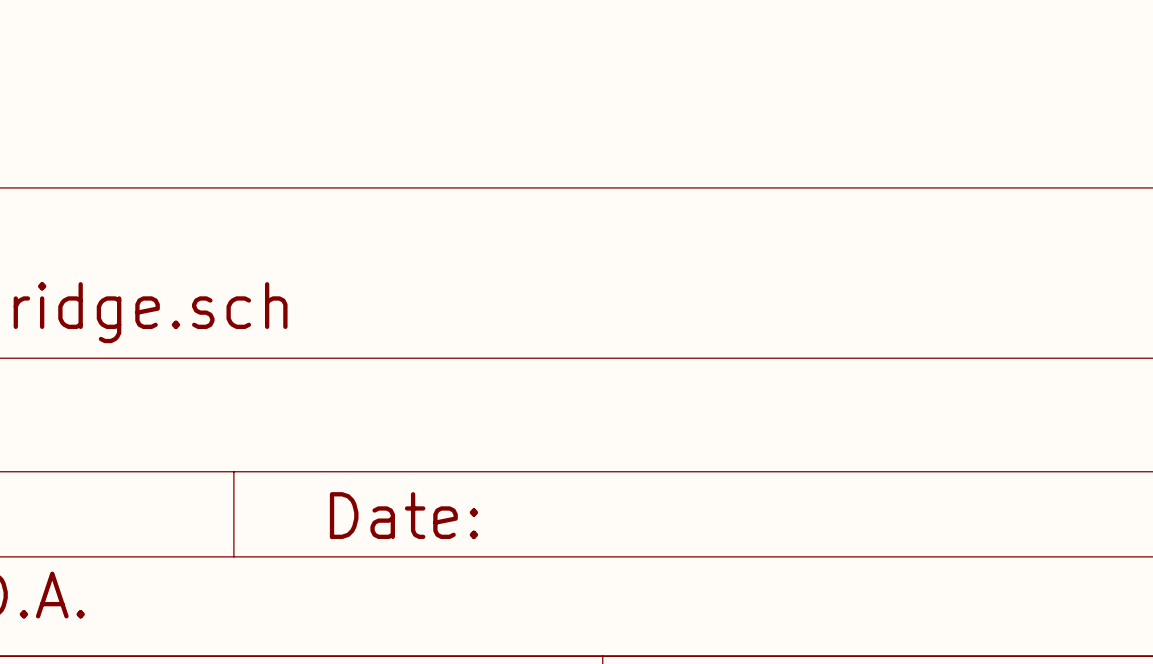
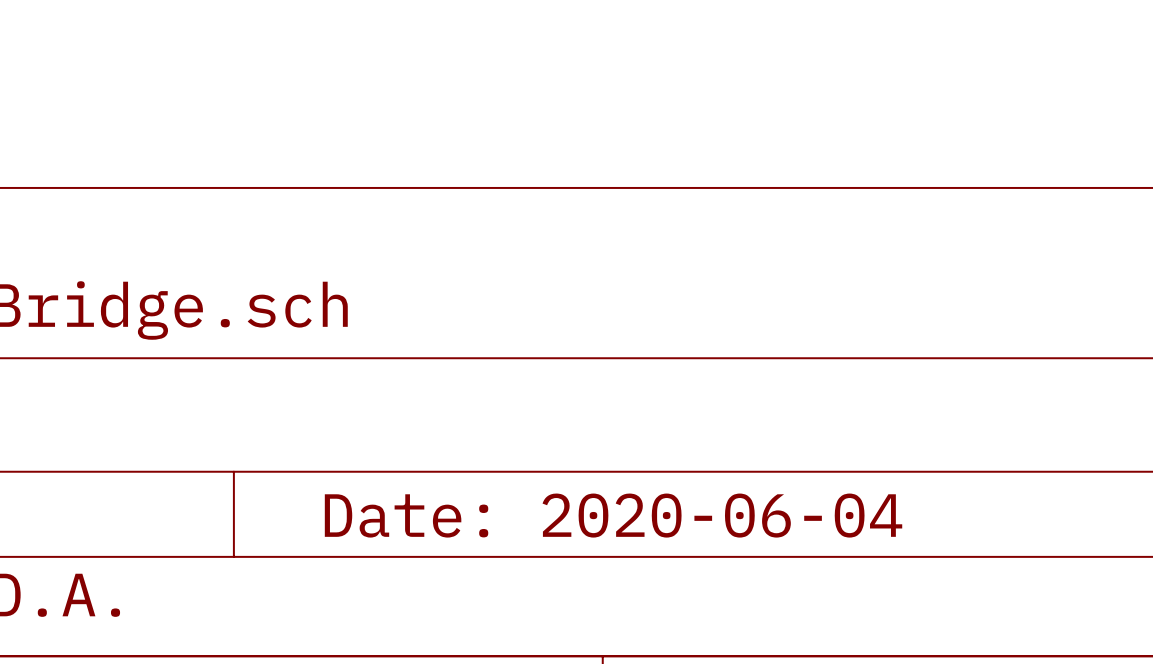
title block: Date: (403, 515) -> Date: 2020-06-04 (613, 515)

